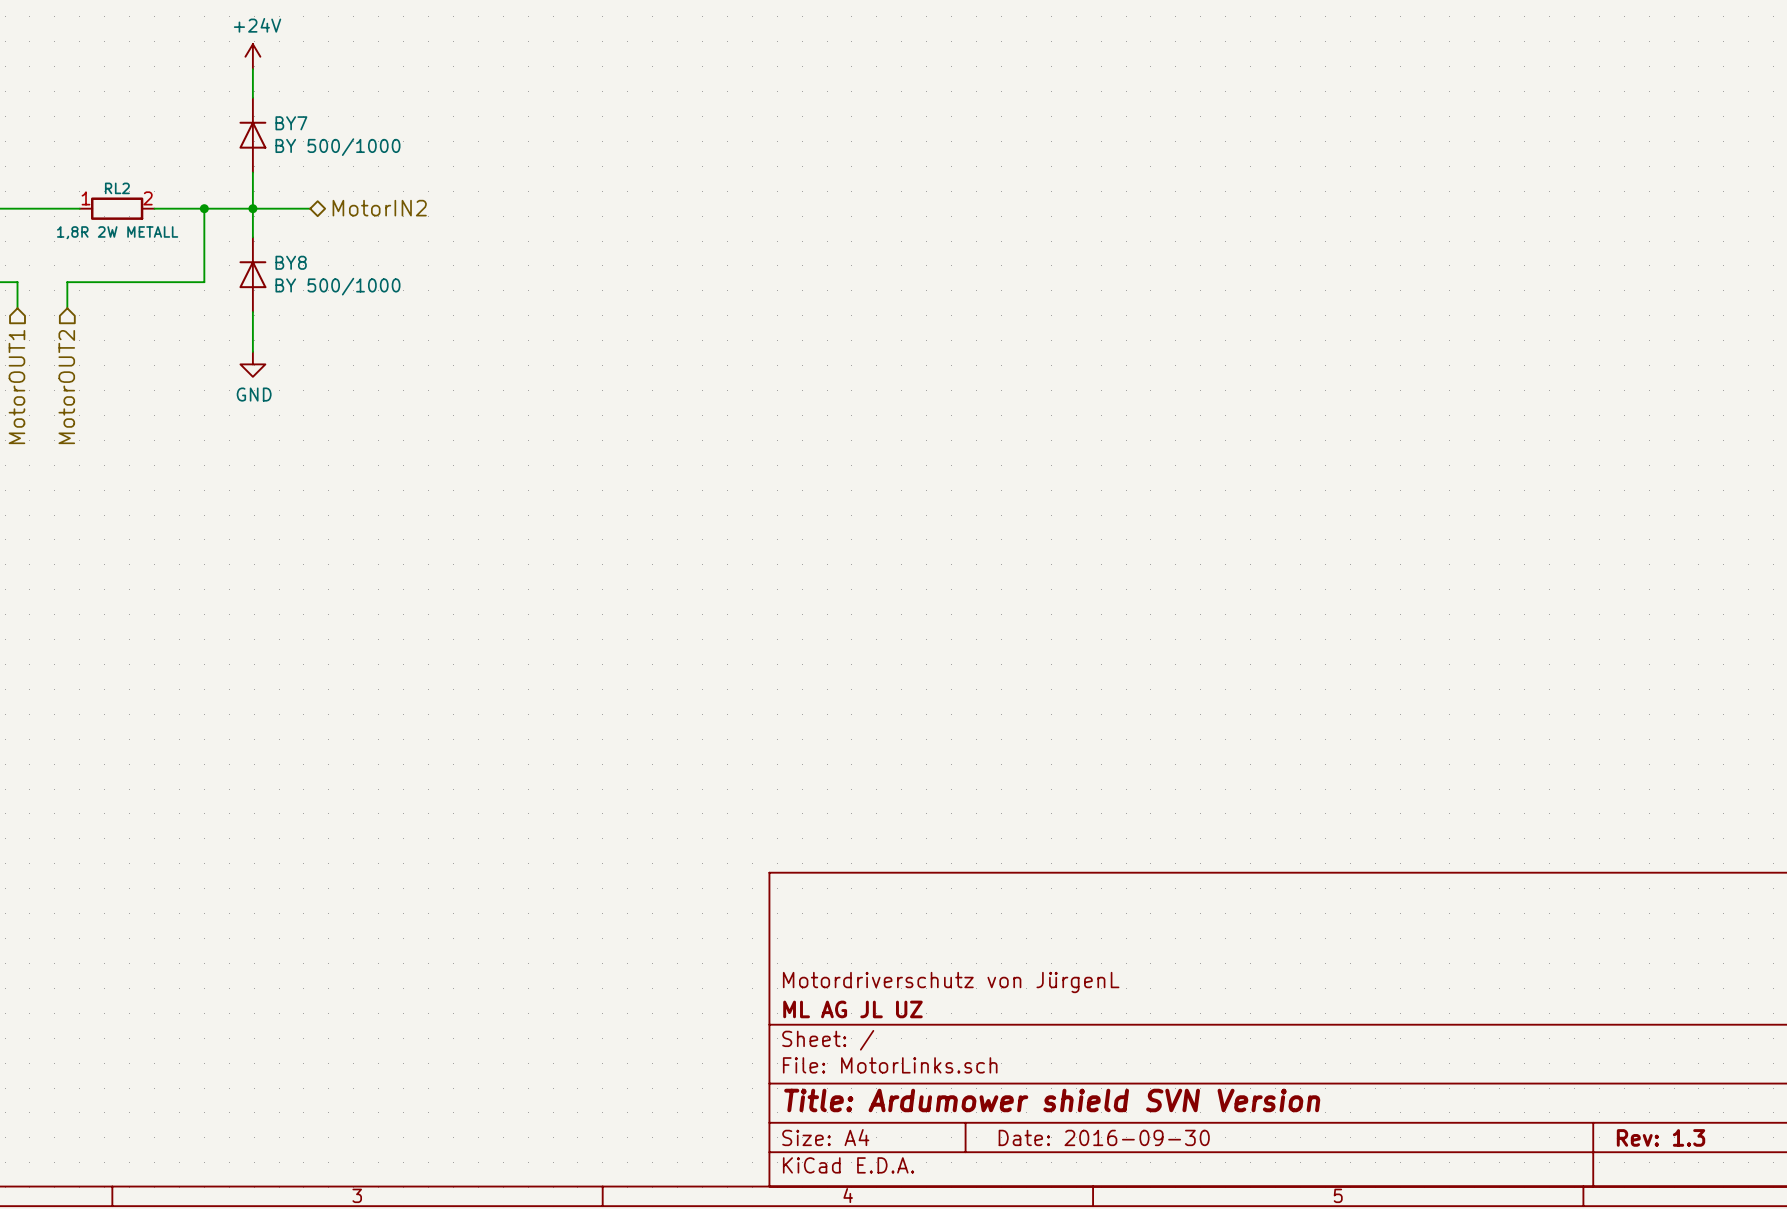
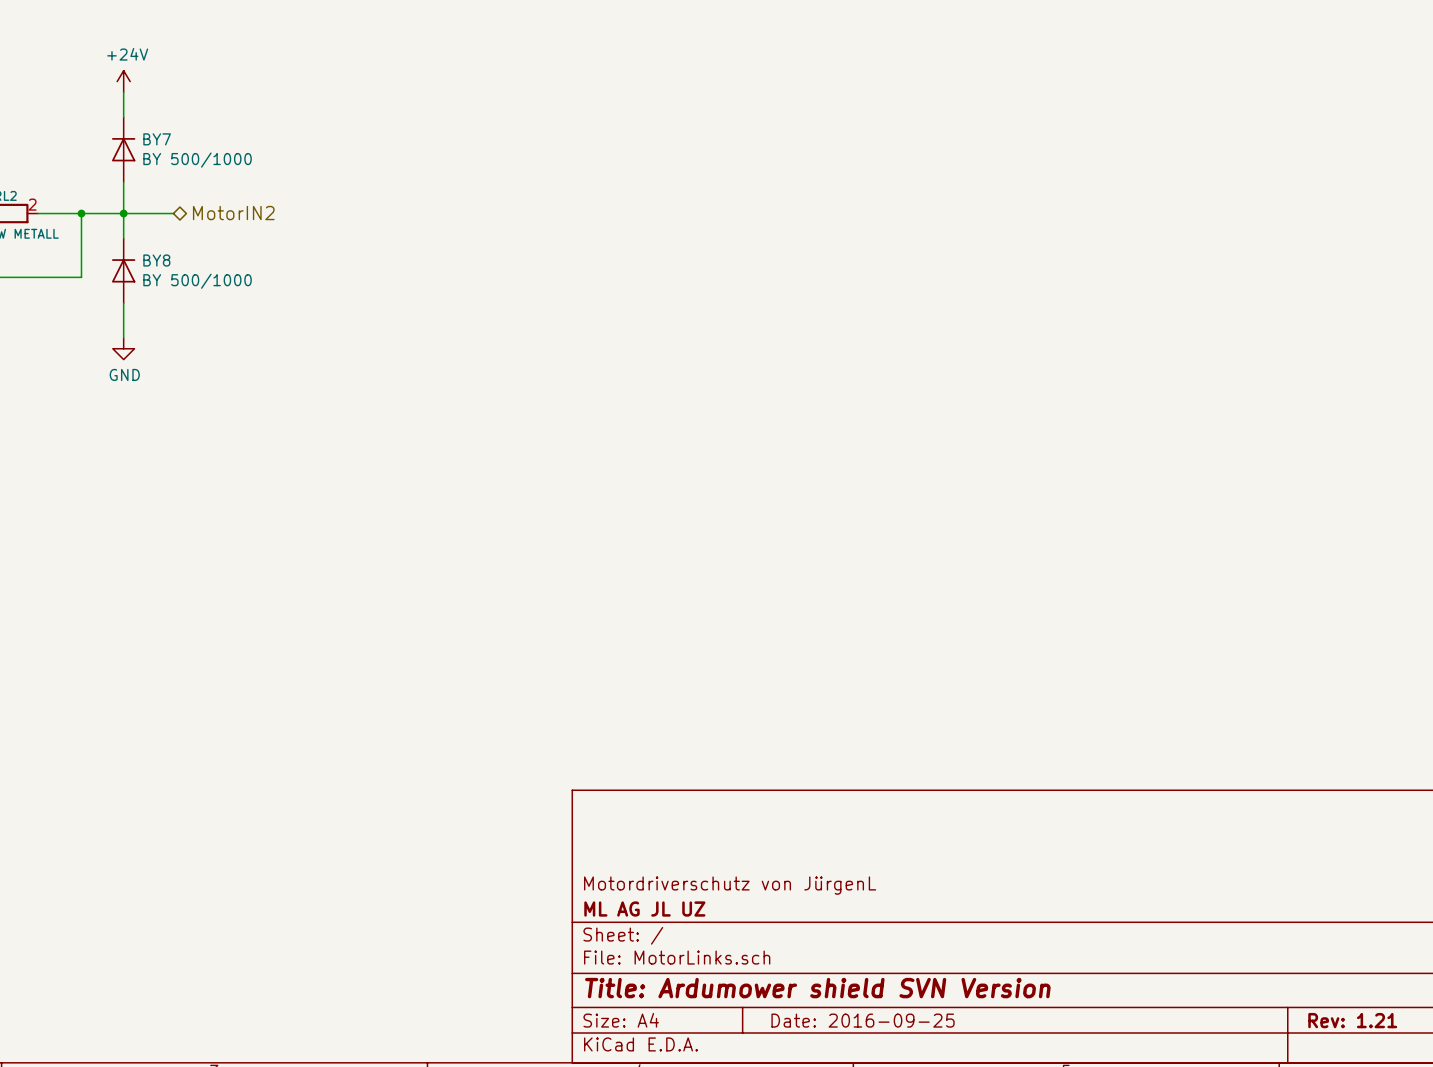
title block: Date: 2016-09-30 (1104, 1137) -> Date: 2016-09-25 (863, 1020)
title block: Rev: 1.3 (1661, 1137) -> Rev: 1.21 (1352, 1020)

